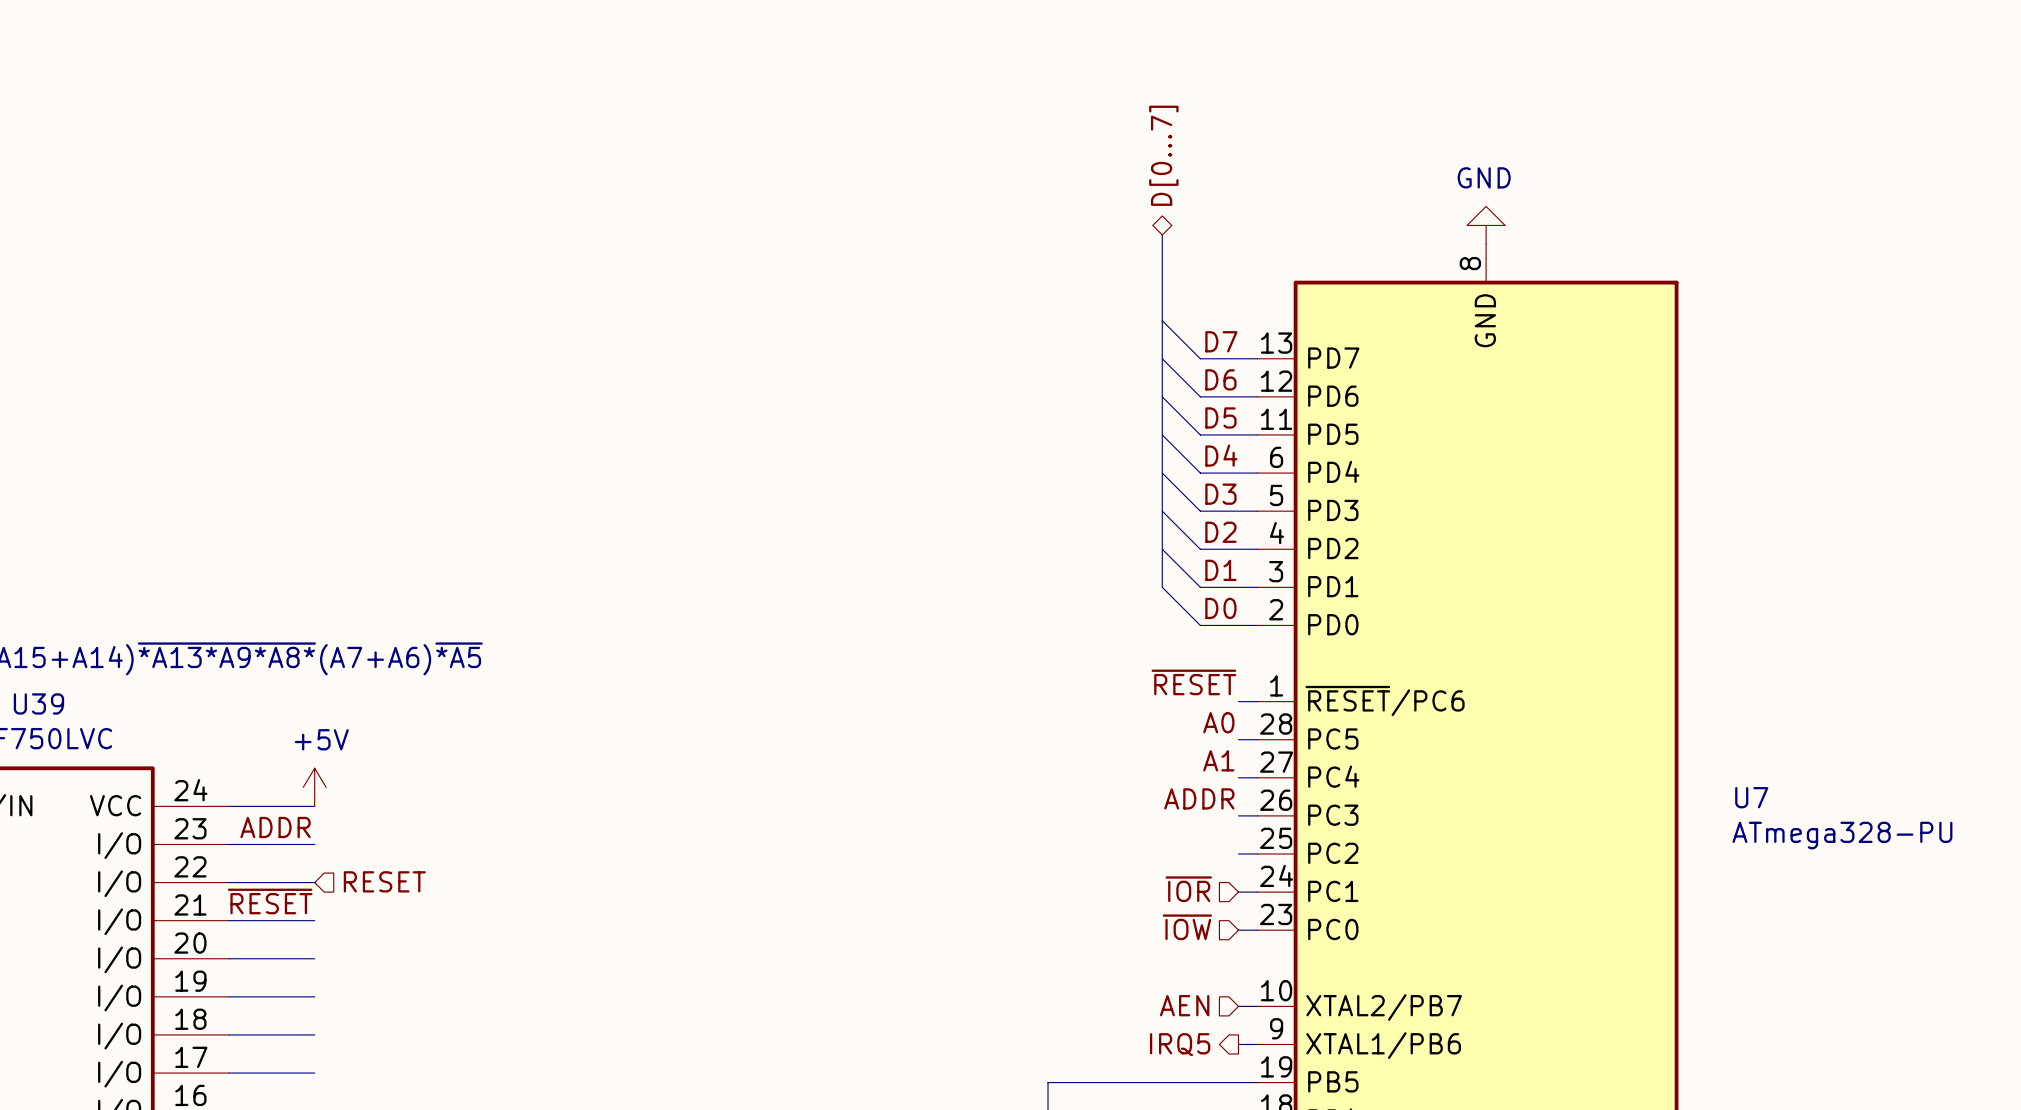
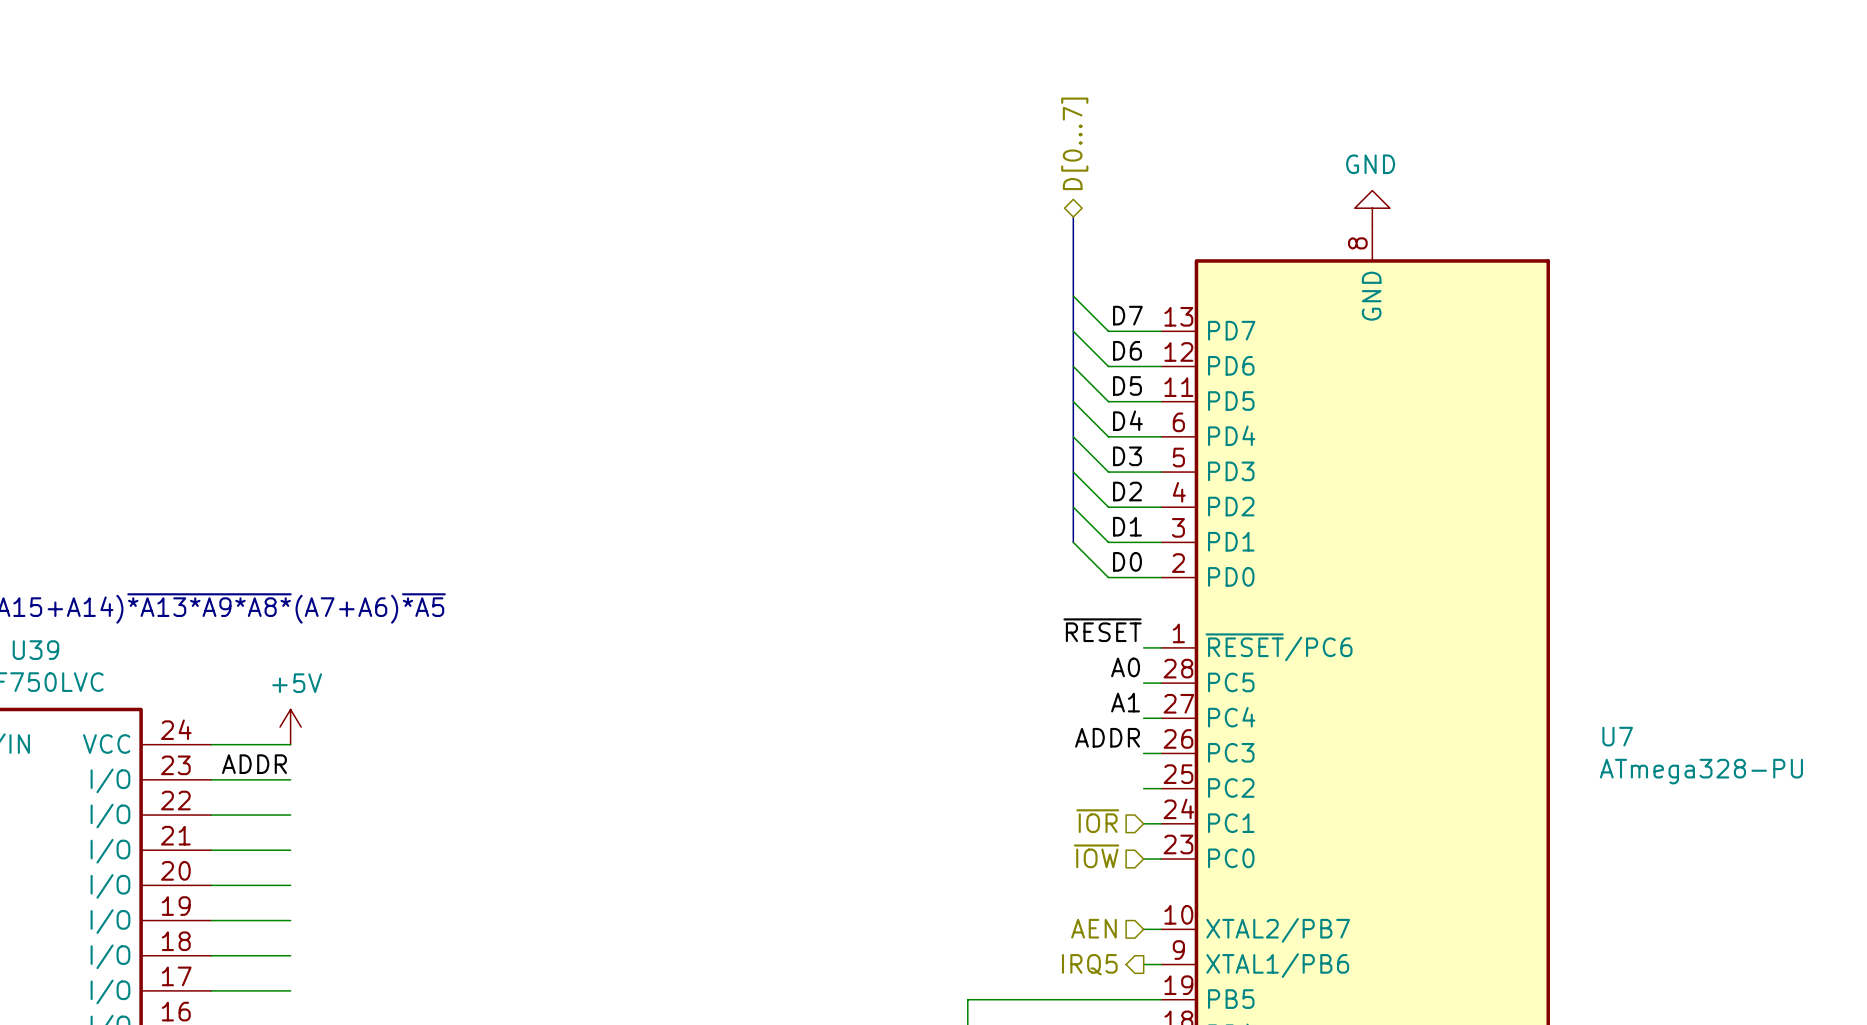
hierarchical label: RESET (384, 881) -> none
label: ~{RESET} (270, 901) -> none

